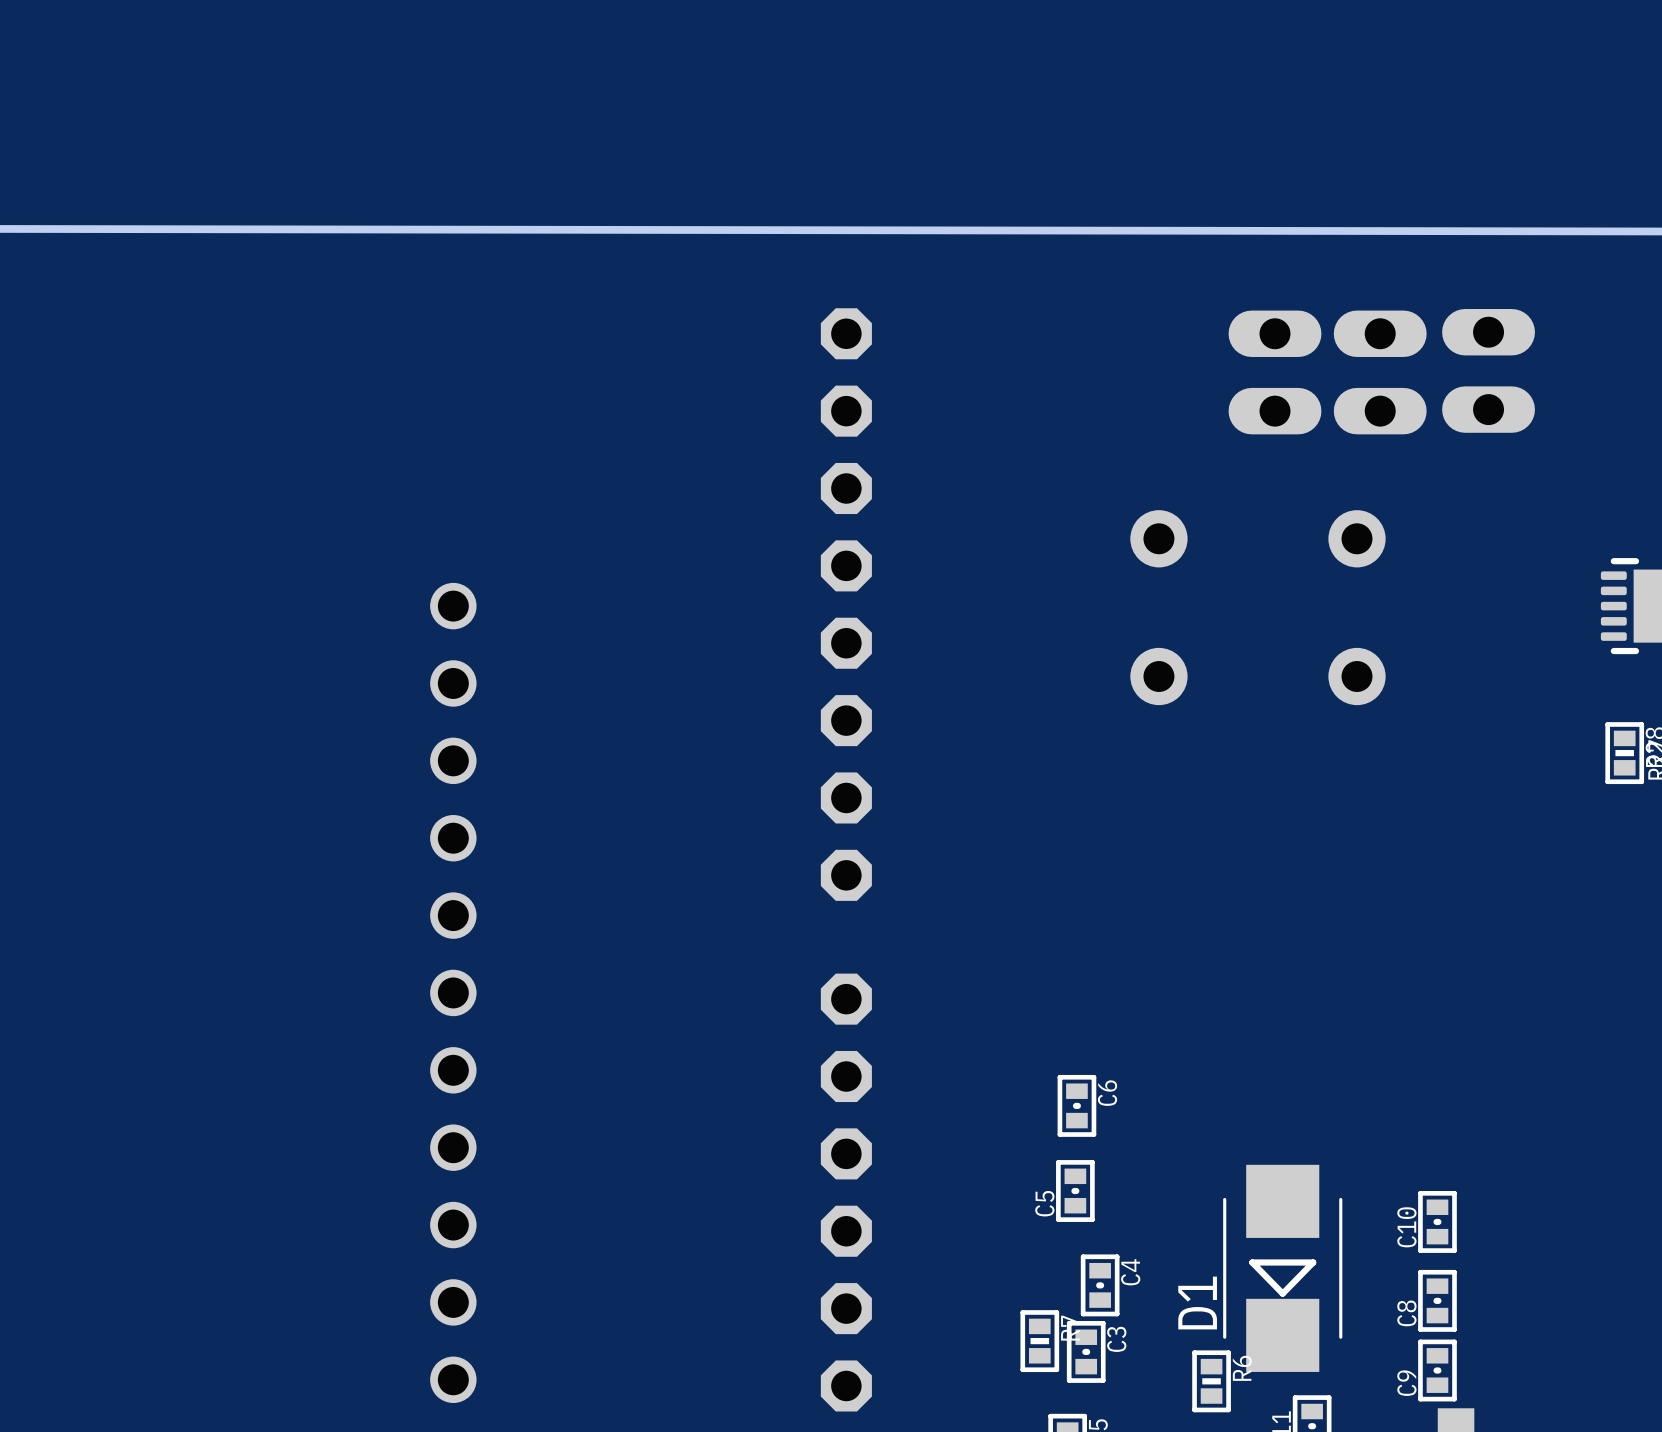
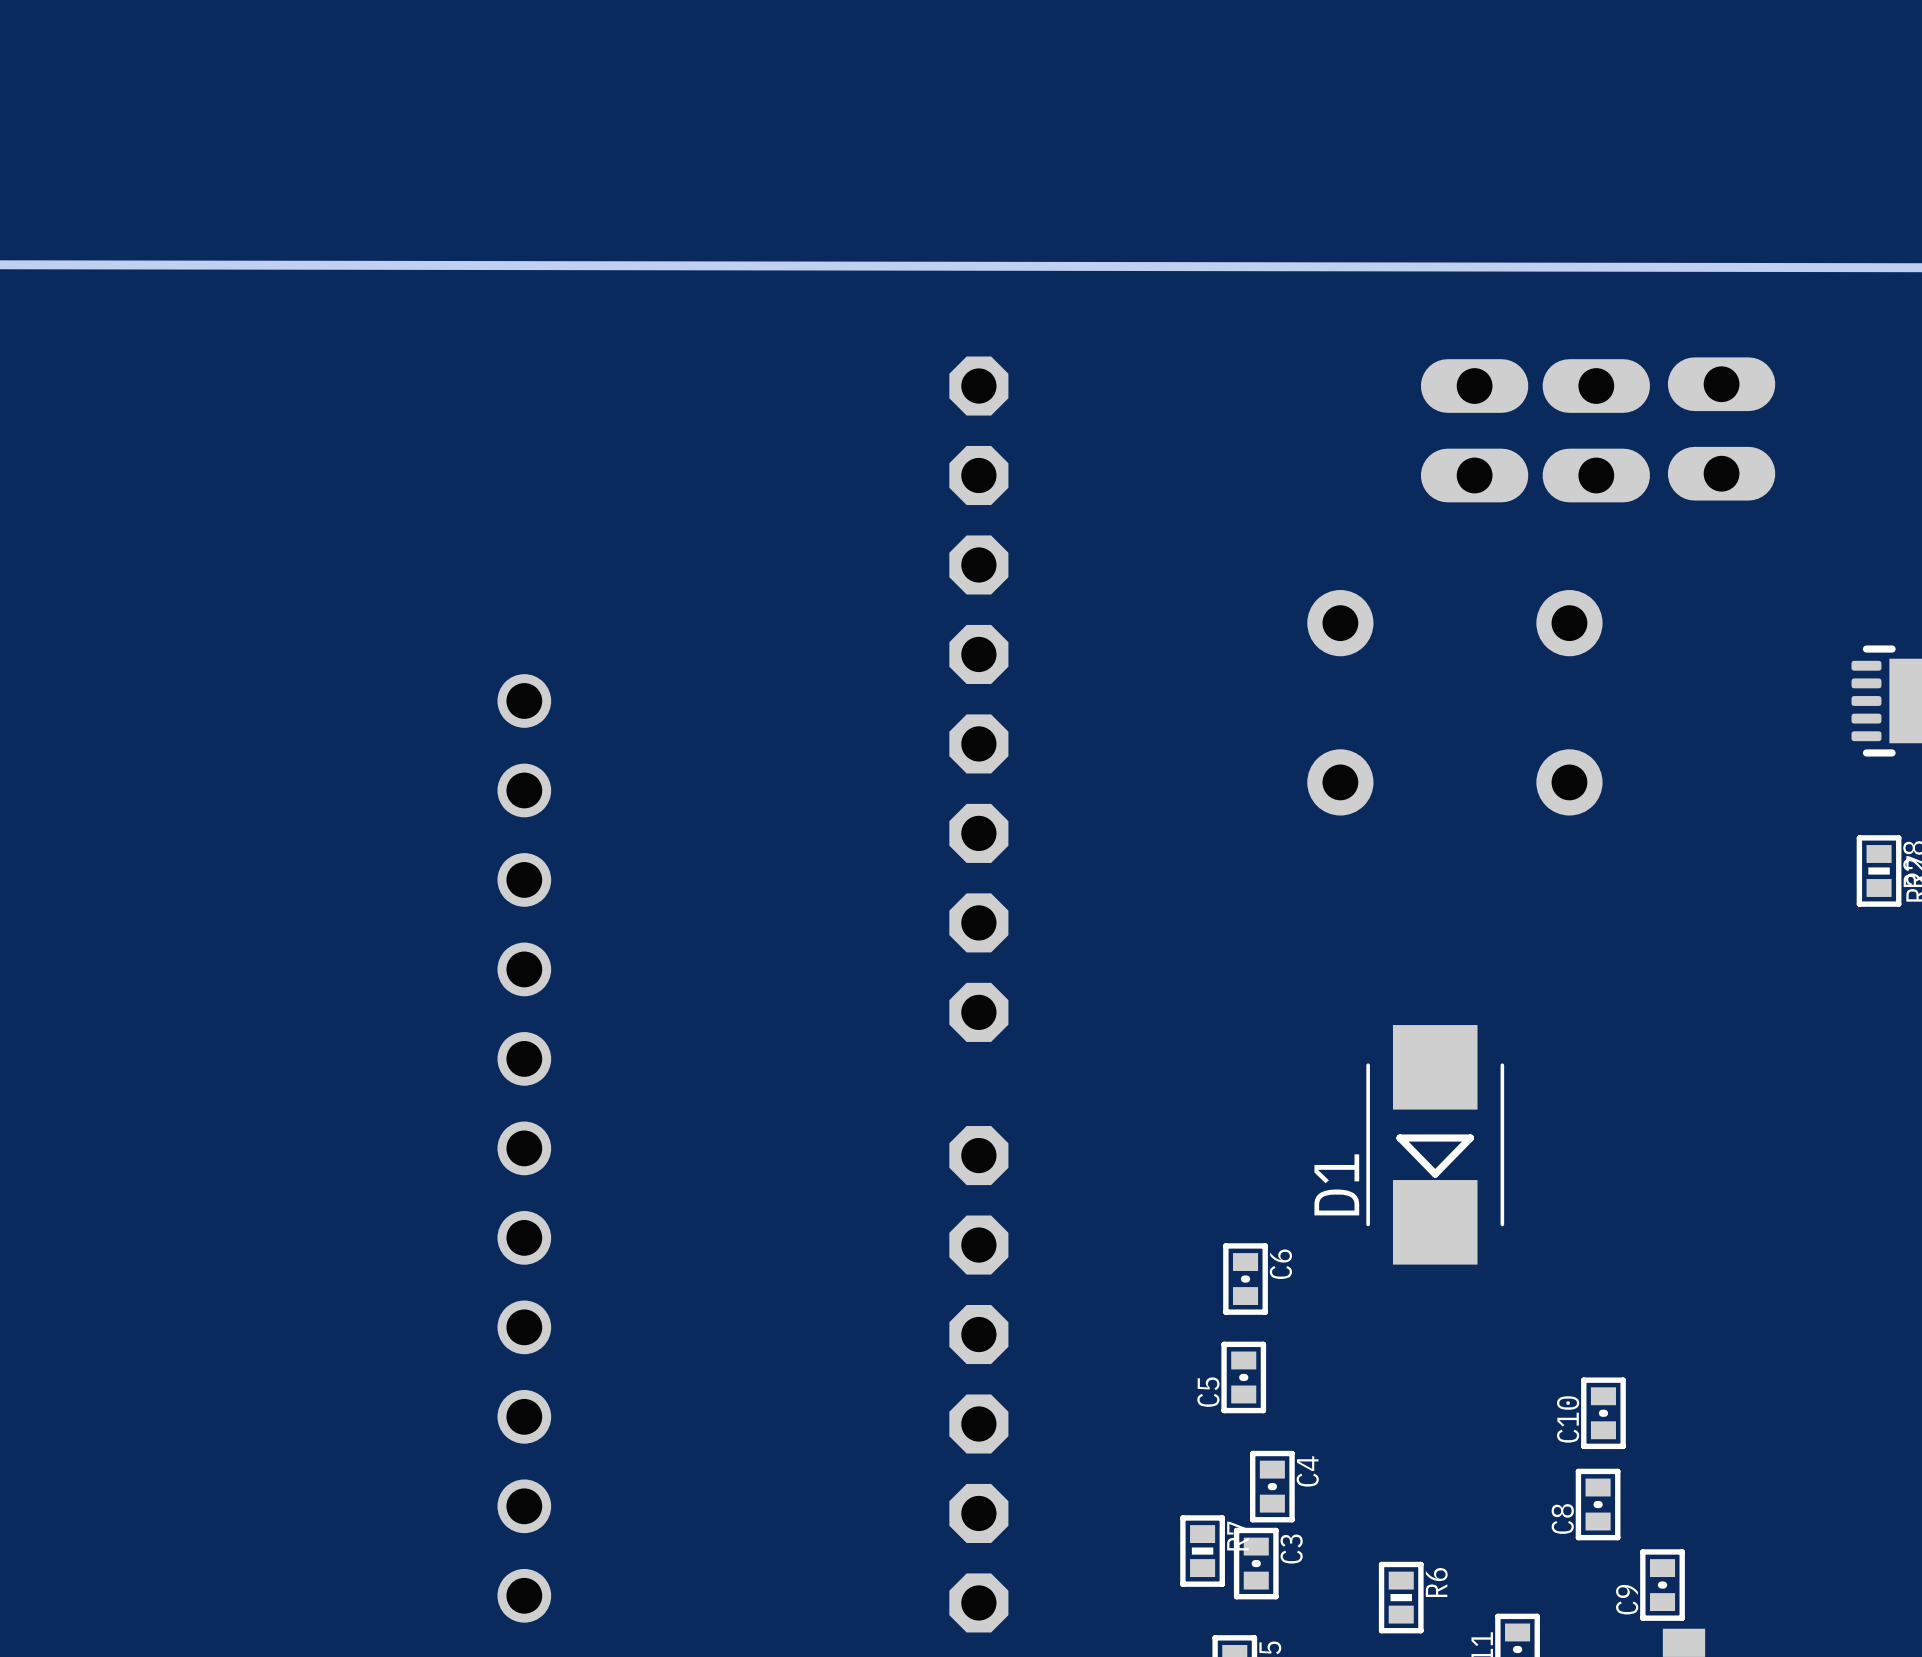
C10 position: (1437, 1221) -> (1603, 1413)
D1 position: (1282, 1268) -> (1435, 1144)
C8 position: (1437, 1300) -> (1598, 1504)

